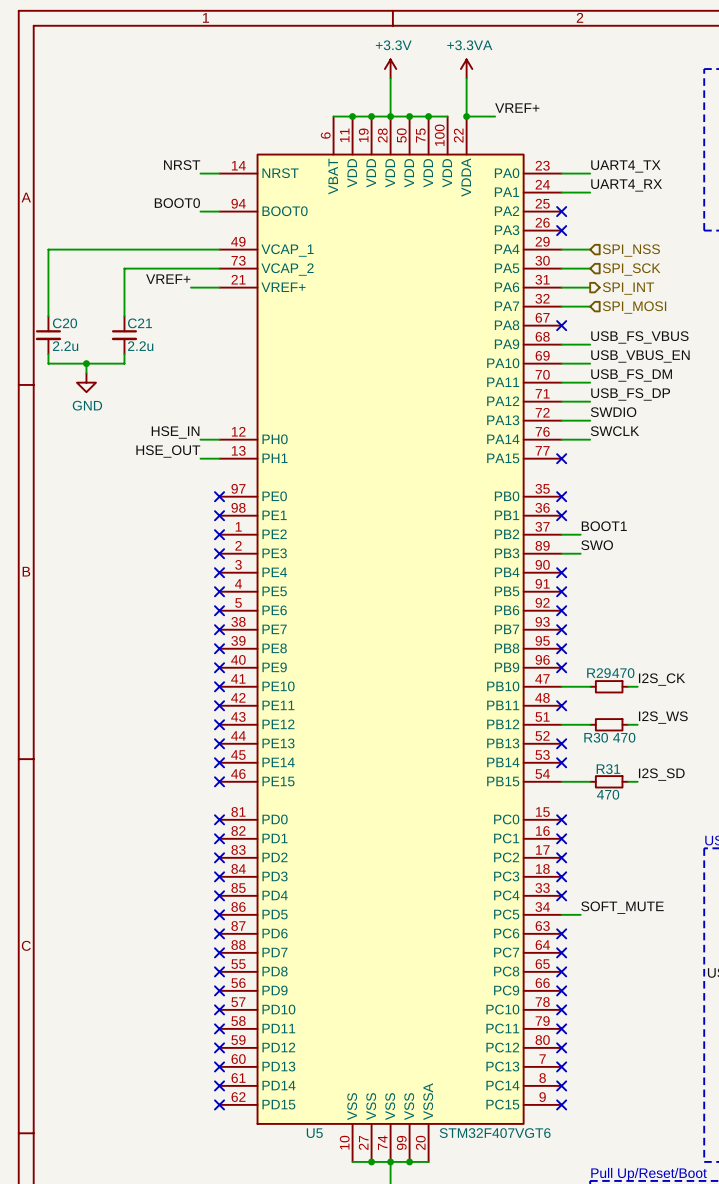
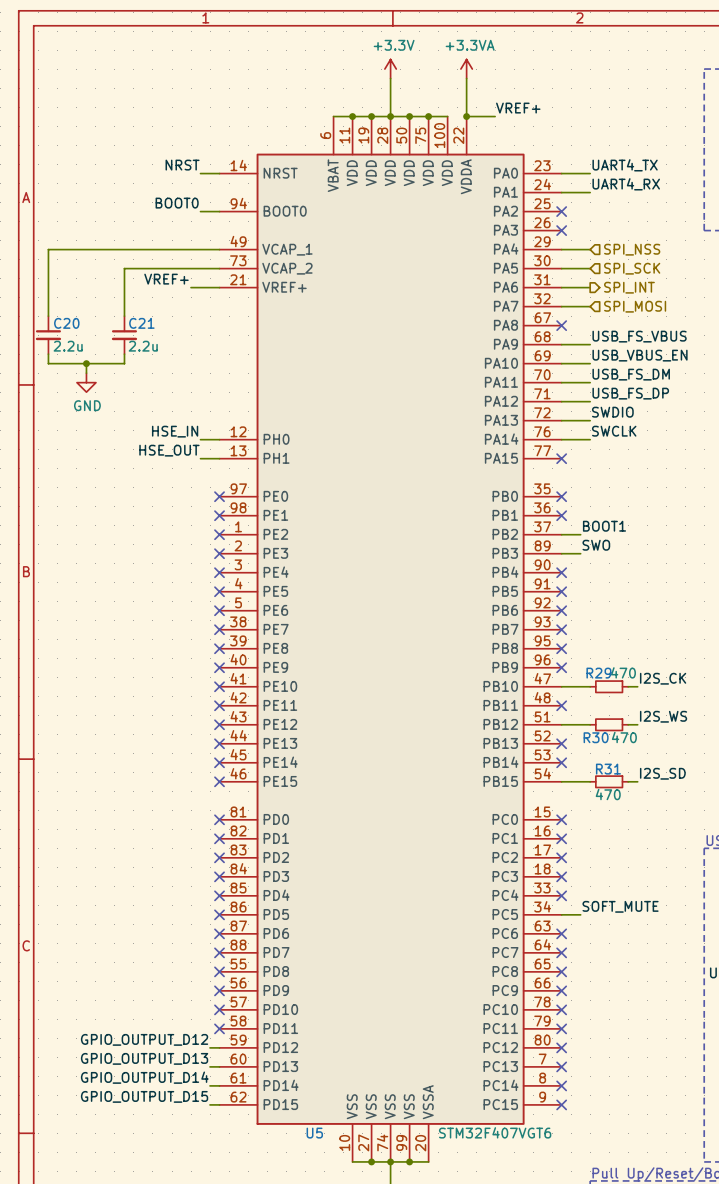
label: none -> GPIO_OUTPUT_D12 (144, 1039)
wire: none -> (210, 1047) (219, 1047)
no-connect mark: (219, 1047) -> none
label: none -> GPIO_OUTPUT_D13 (144, 1058)
wire: none -> (210, 1066) (219, 1066)
no-connect mark: (219, 1066) -> none
label: none -> GPIO_OUTPUT_D14 (144, 1077)
wire: none -> (210, 1085) (219, 1085)
no-connect mark: (219, 1085) -> none
label: none -> GPIO_OUTPUT_D15 (144, 1096)
wire: none -> (210, 1104) (219, 1104)
no-connect mark: (219, 1104) -> none

